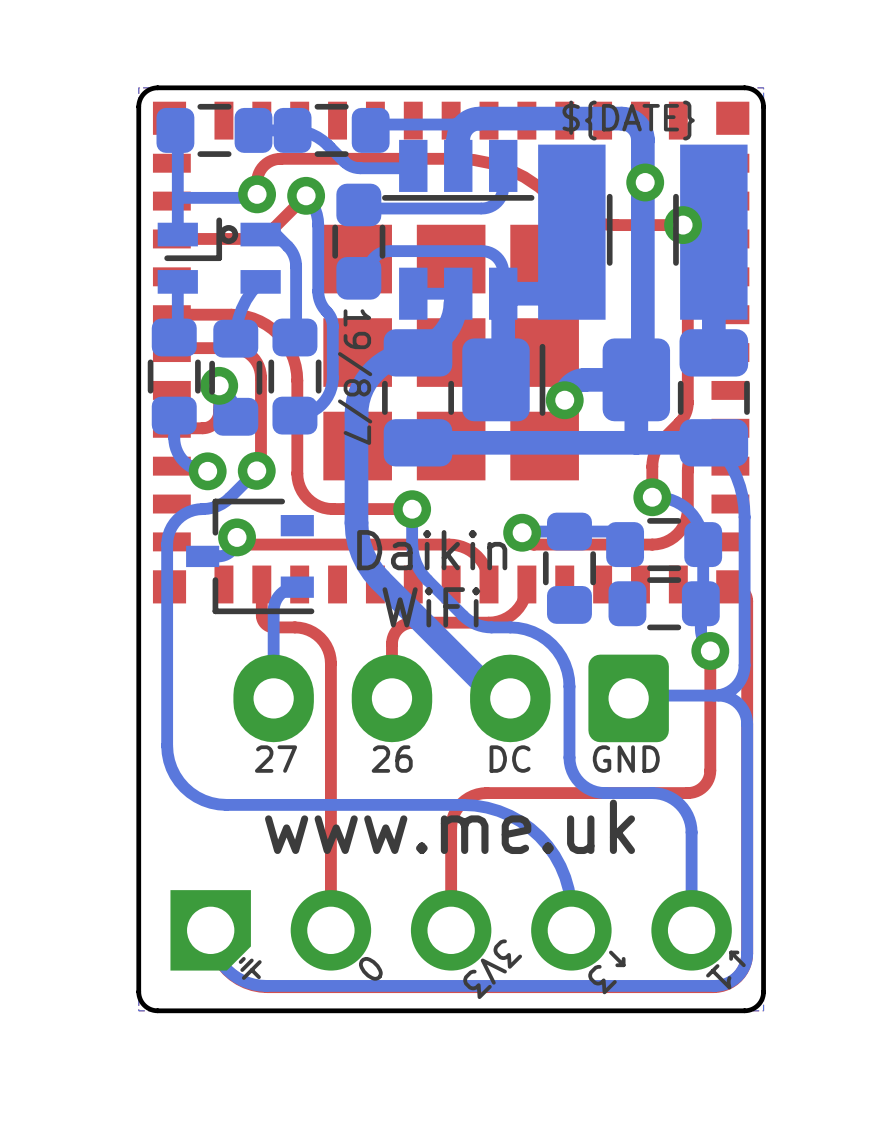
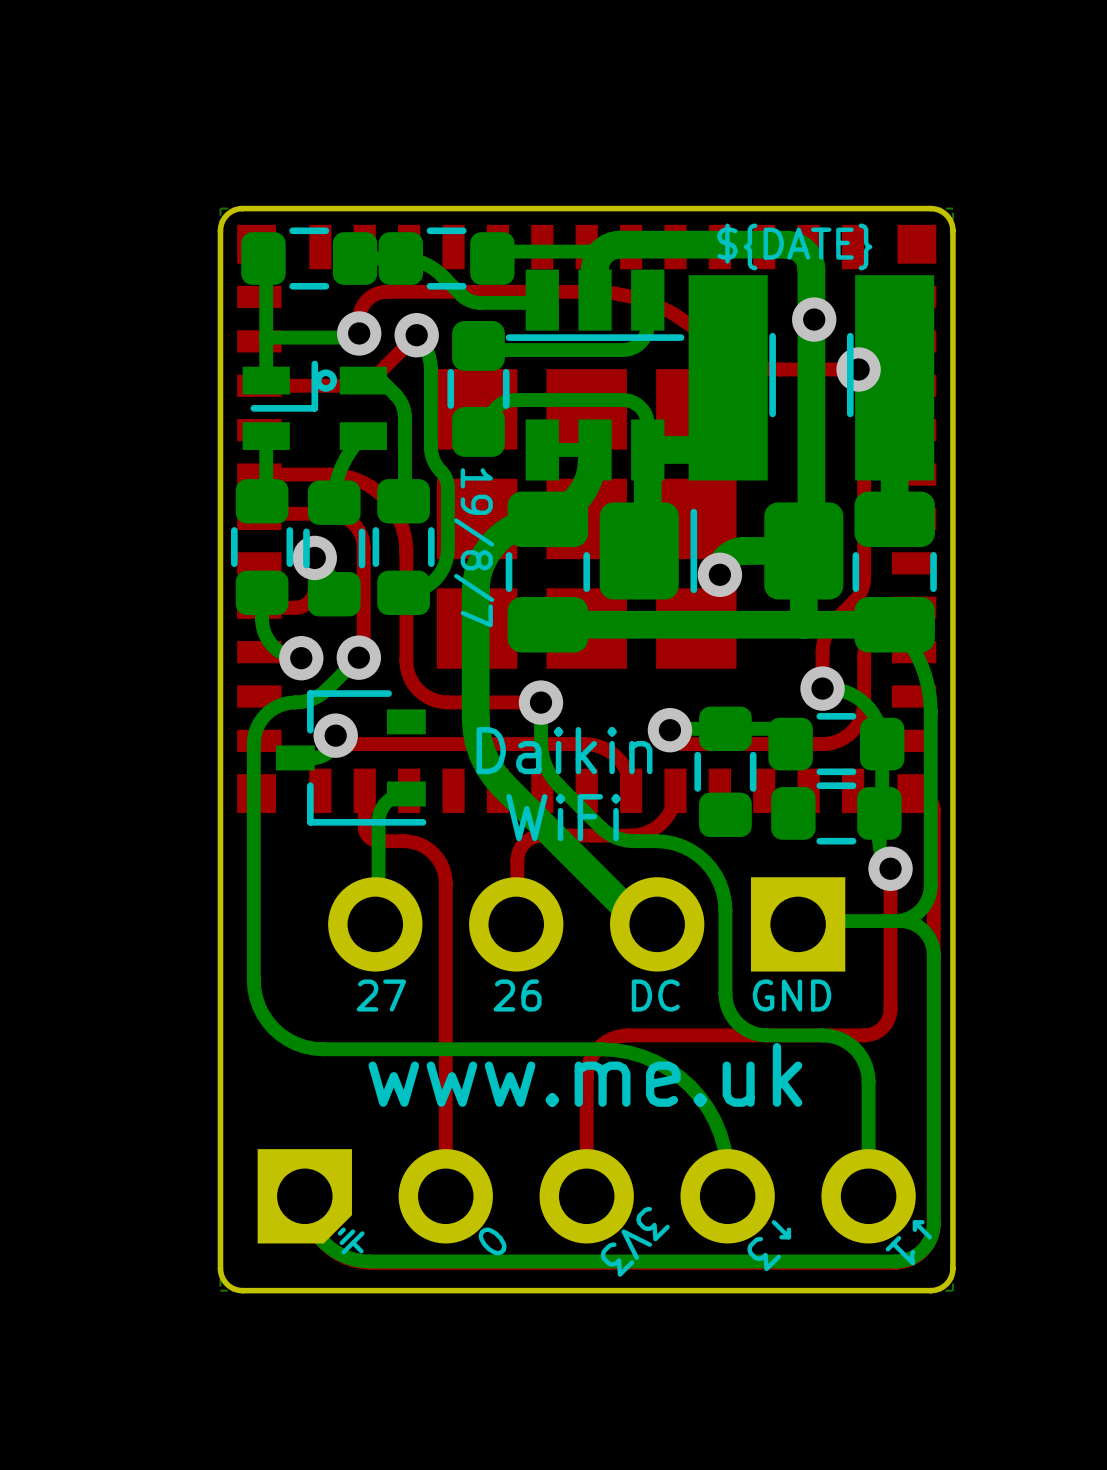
part footprint: [233, 654, 669, 743] -> [328, 877, 846, 972]

